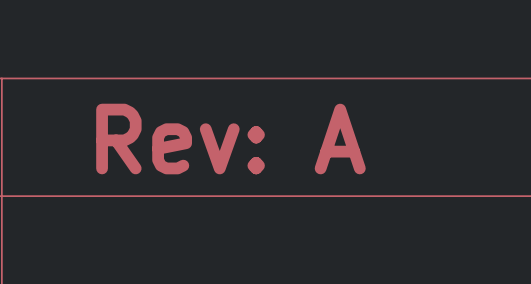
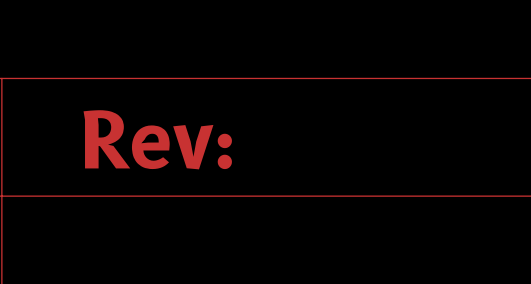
title block: Rev: A (230, 139) -> Rev: (157, 139)

